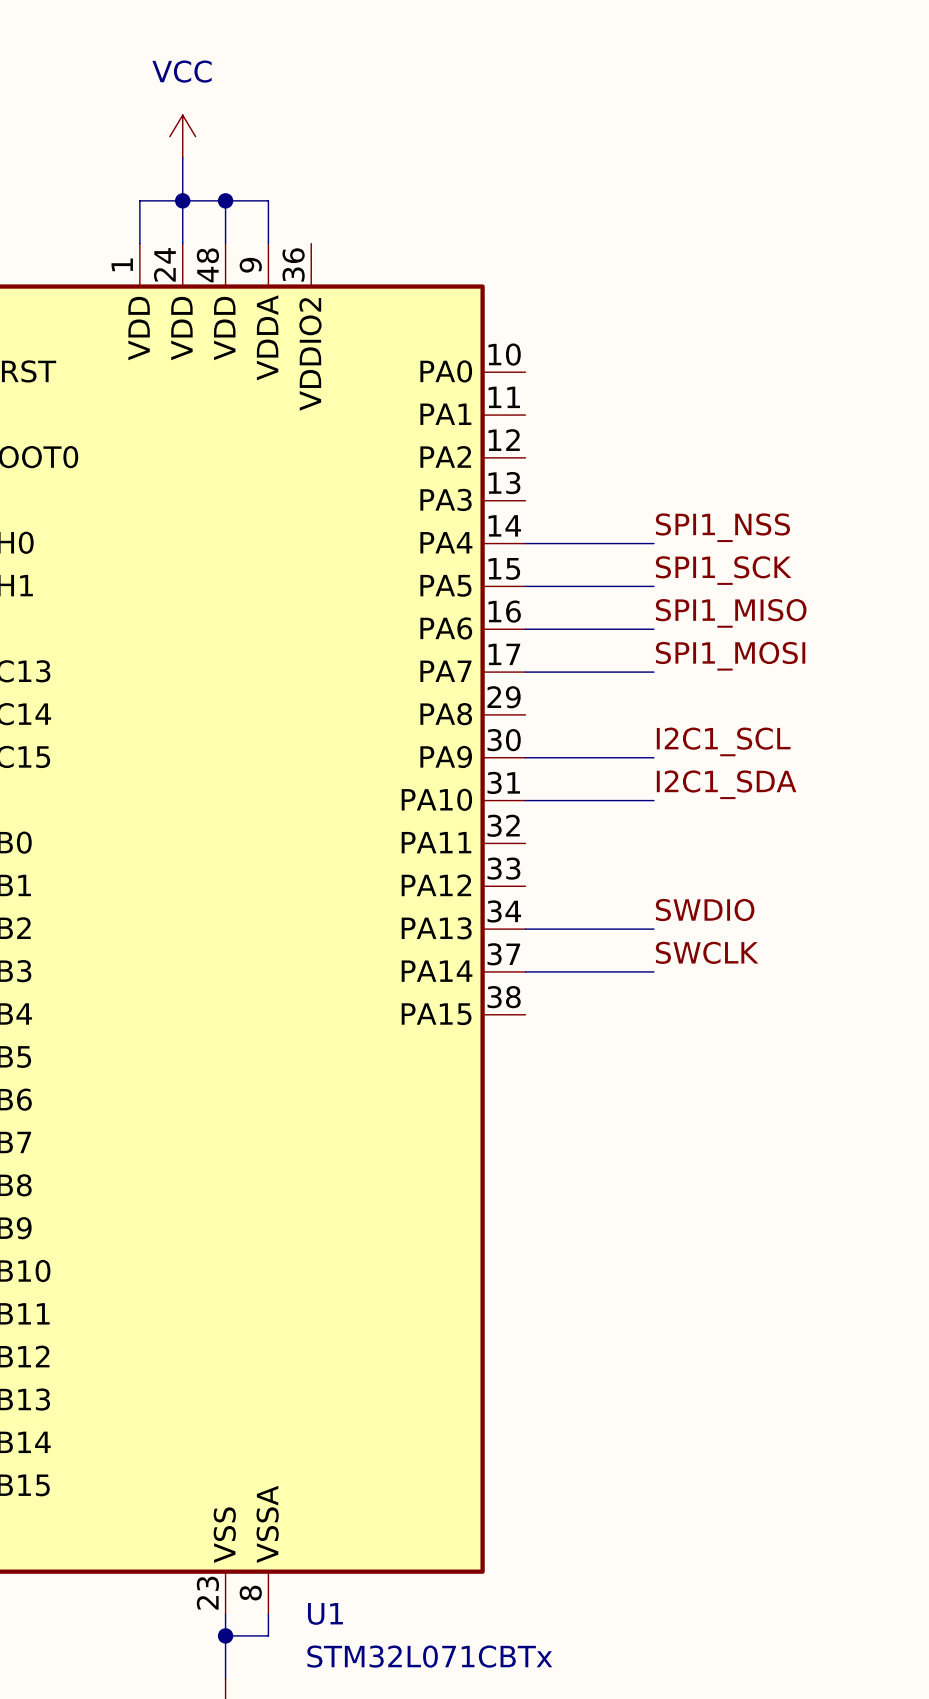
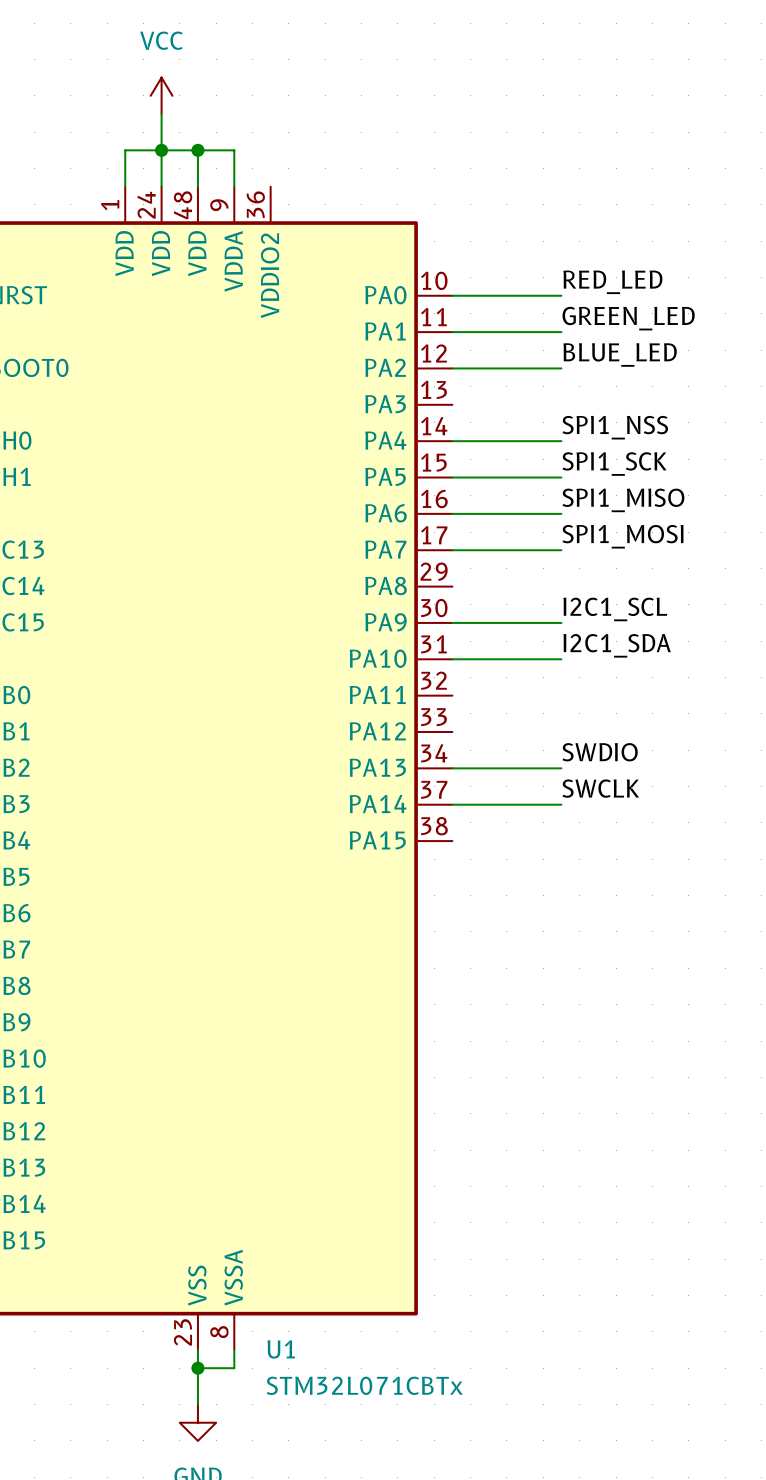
label: none -> RED_LED (612, 282)
wire: none -> (452, 295) (561, 295)
label: none -> GREEN_LED (628, 318)
wire: none -> (452, 332) (561, 332)
label: none -> BLUE_LED (620, 354)
wire: none -> (452, 368) (561, 368)

